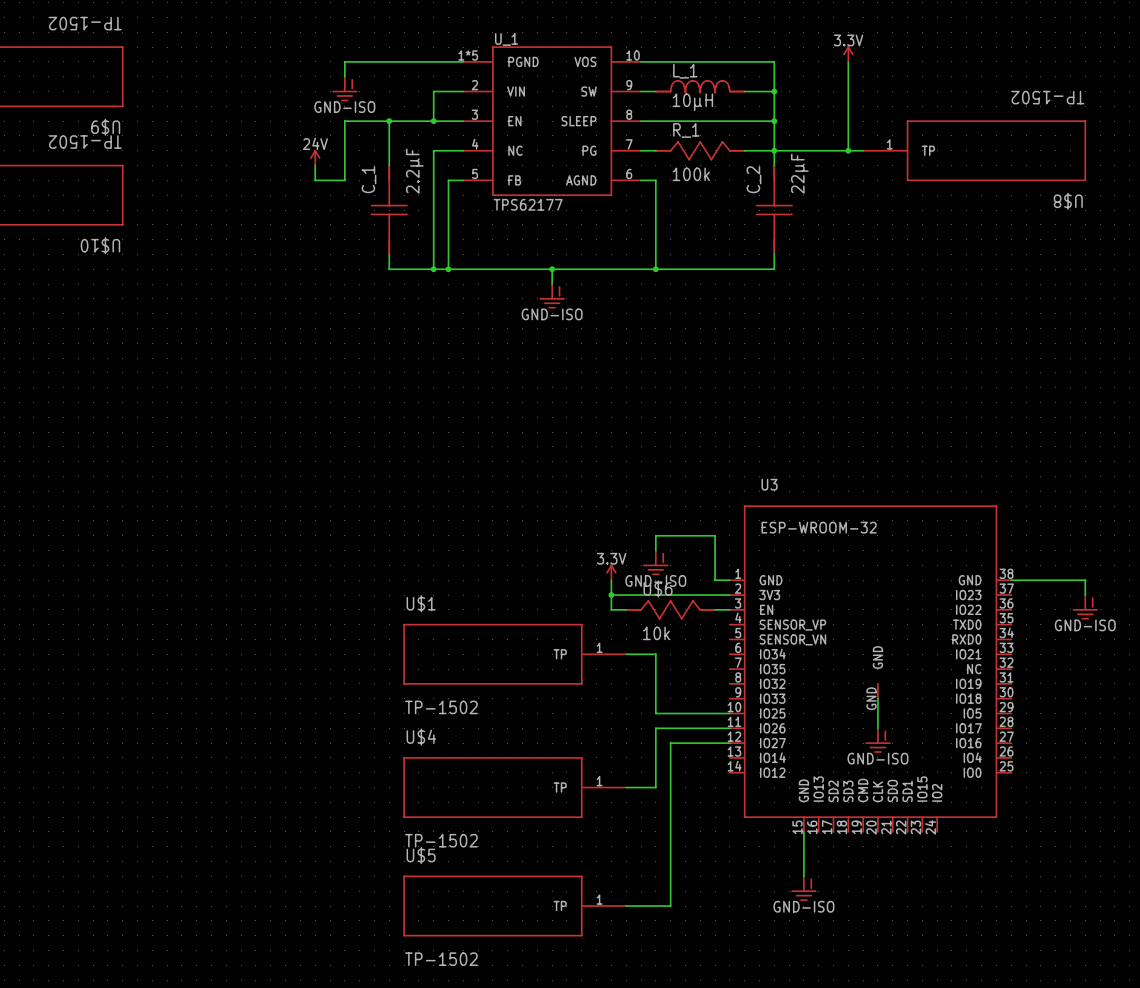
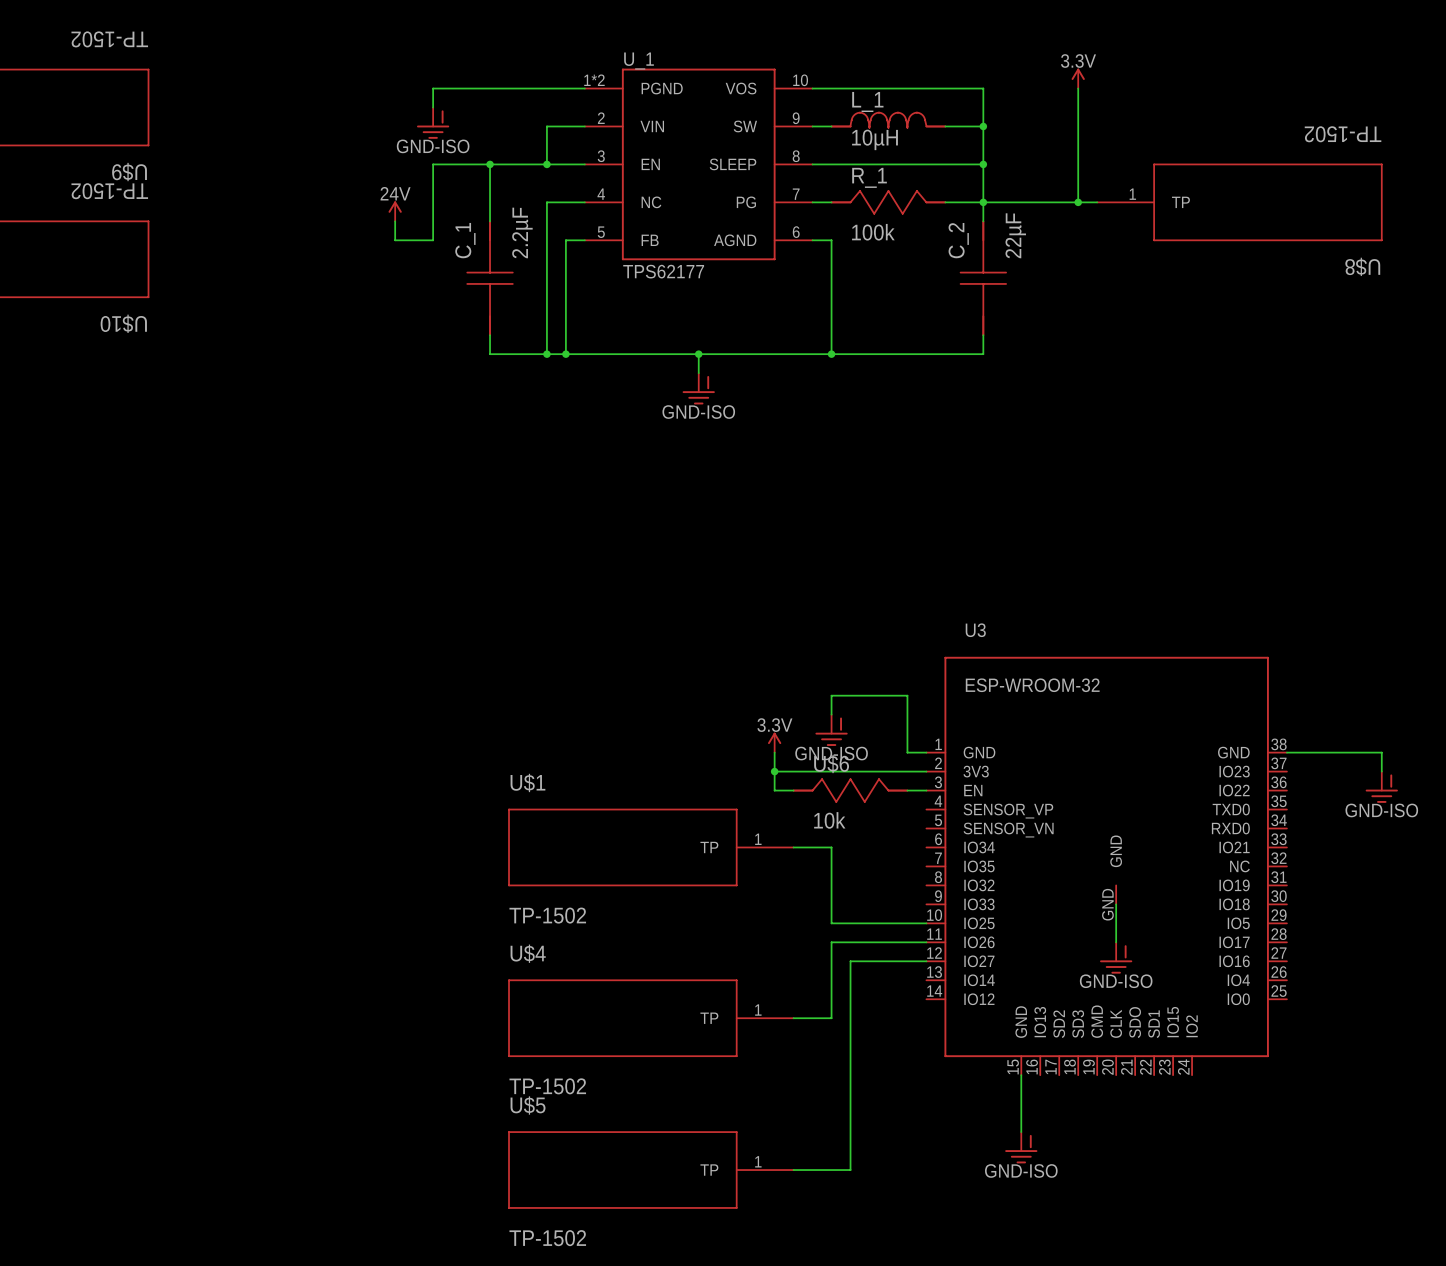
U_1 pin number: 1*5 (468, 55) -> 1*2 (594, 80)

